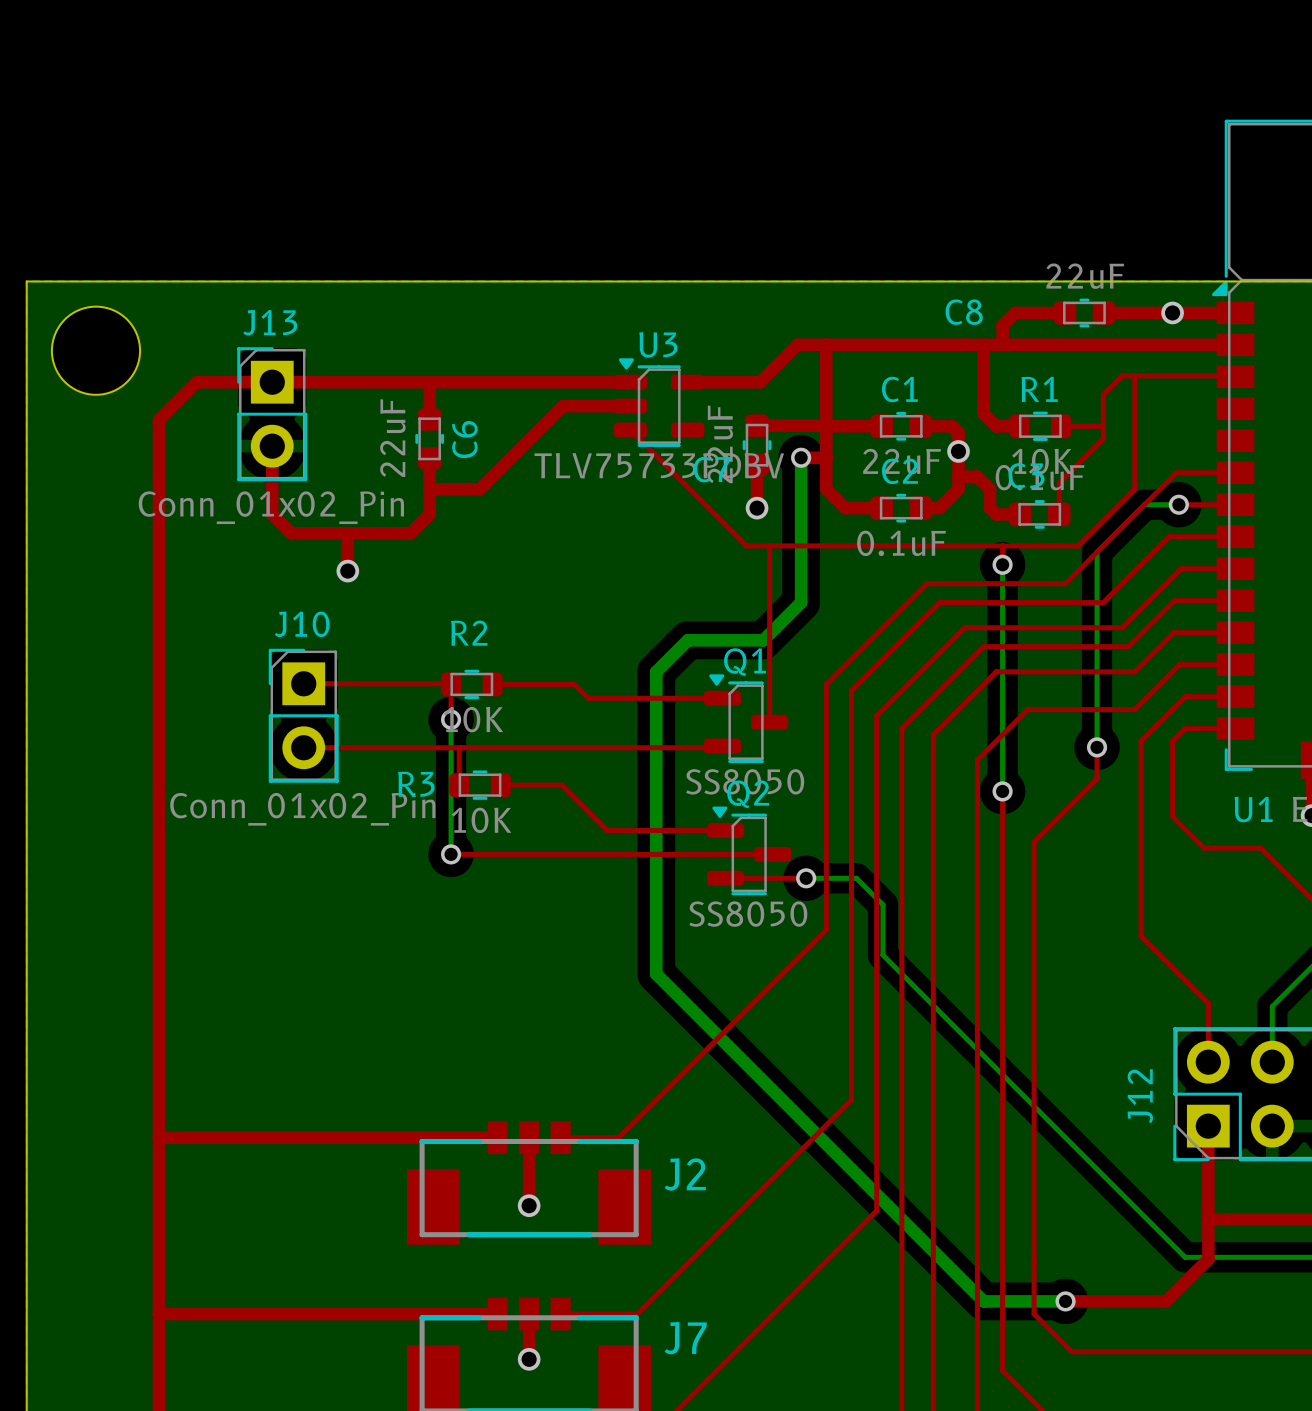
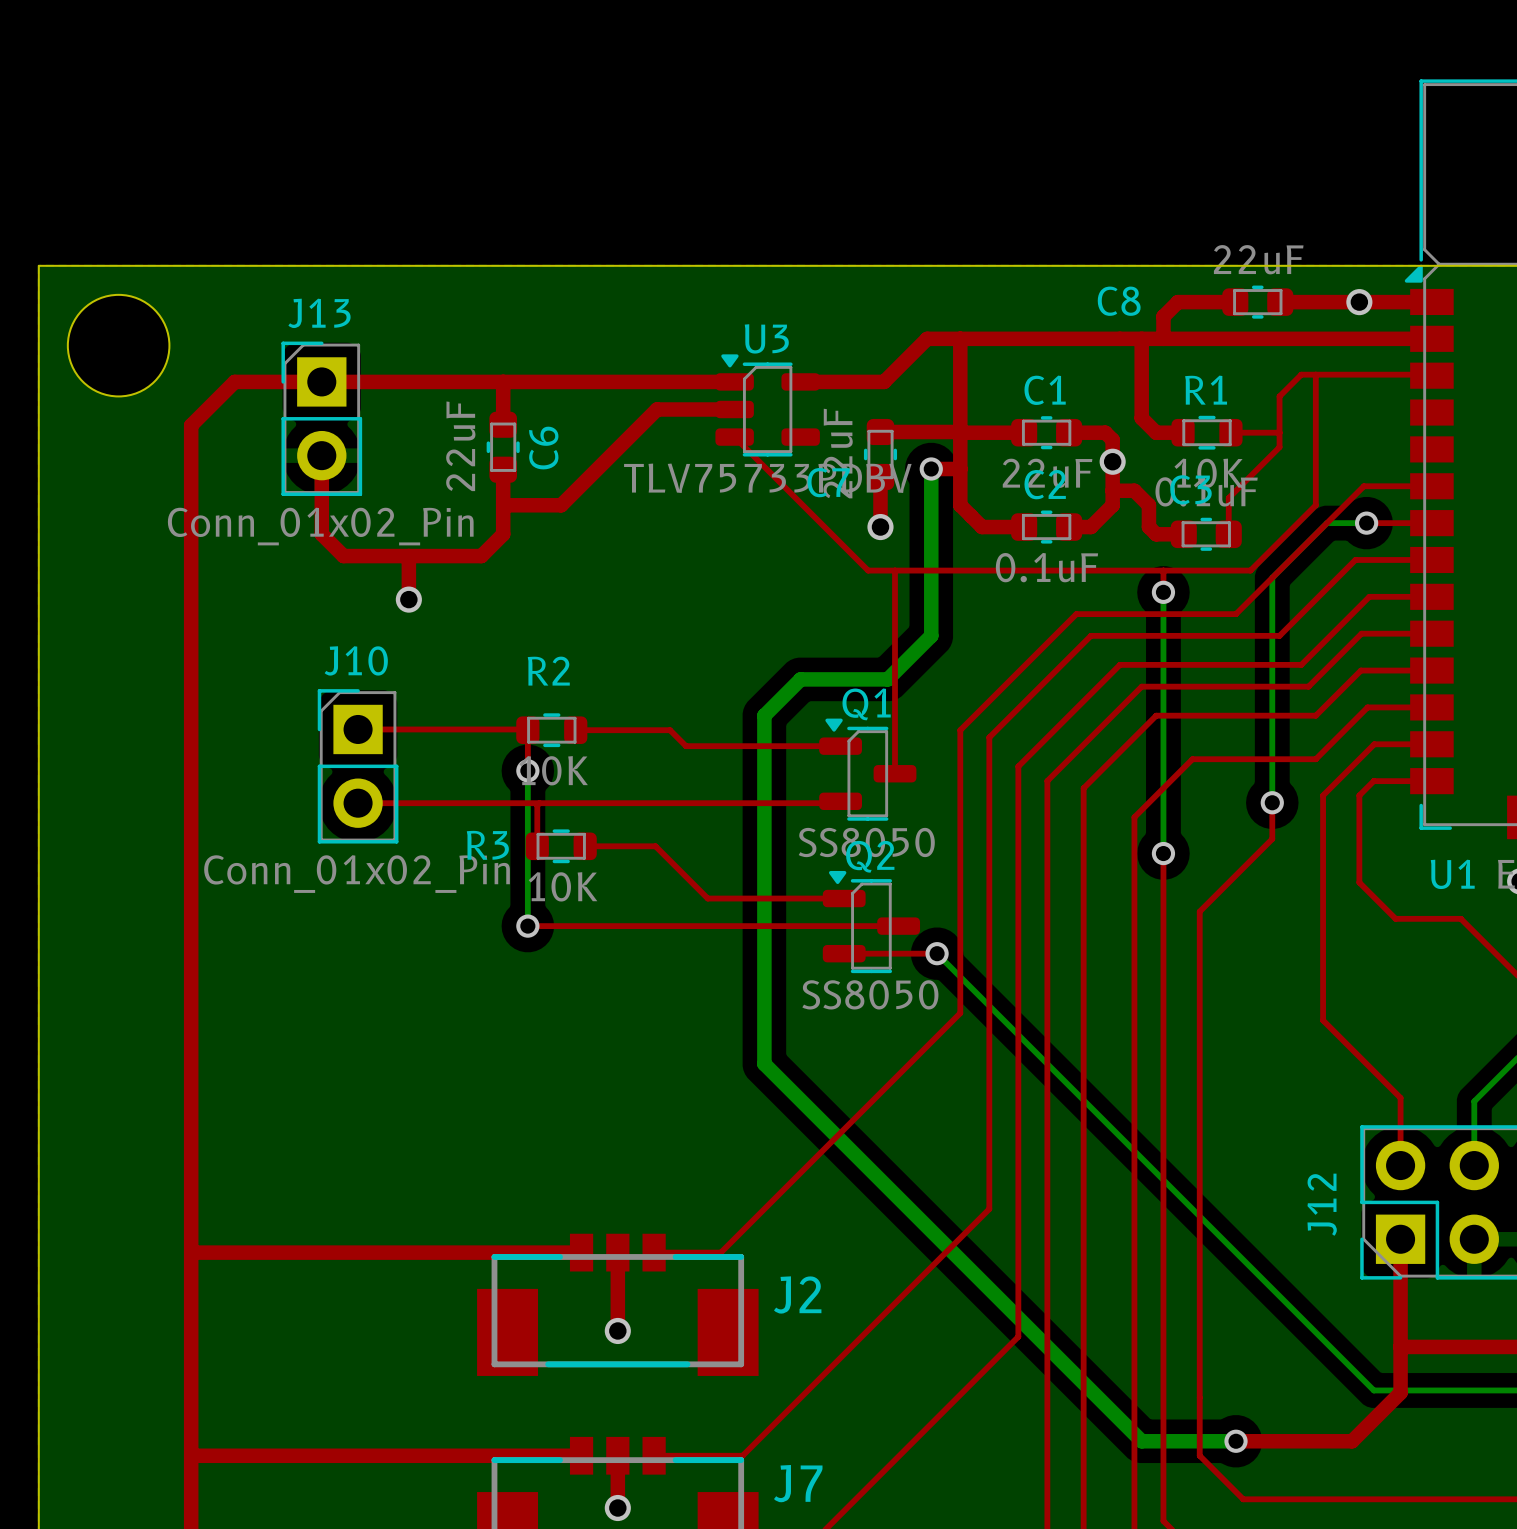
bottom track: (806, 878) (856, 878) (882, 904) (882, 955) -> (937, 953) (1025, 1042)

